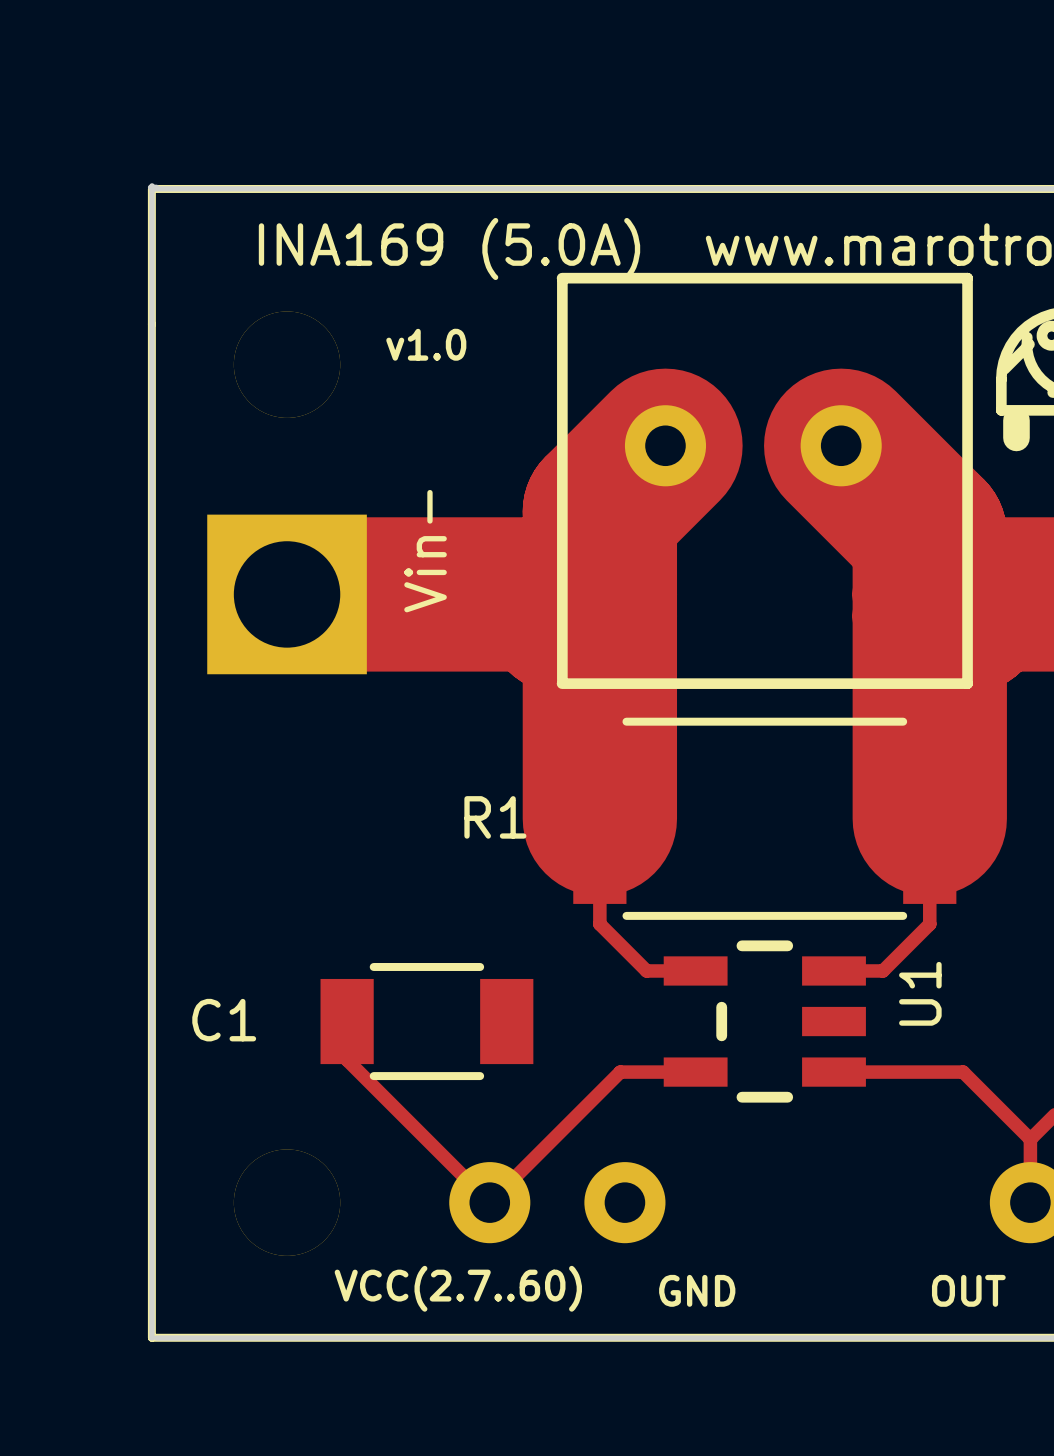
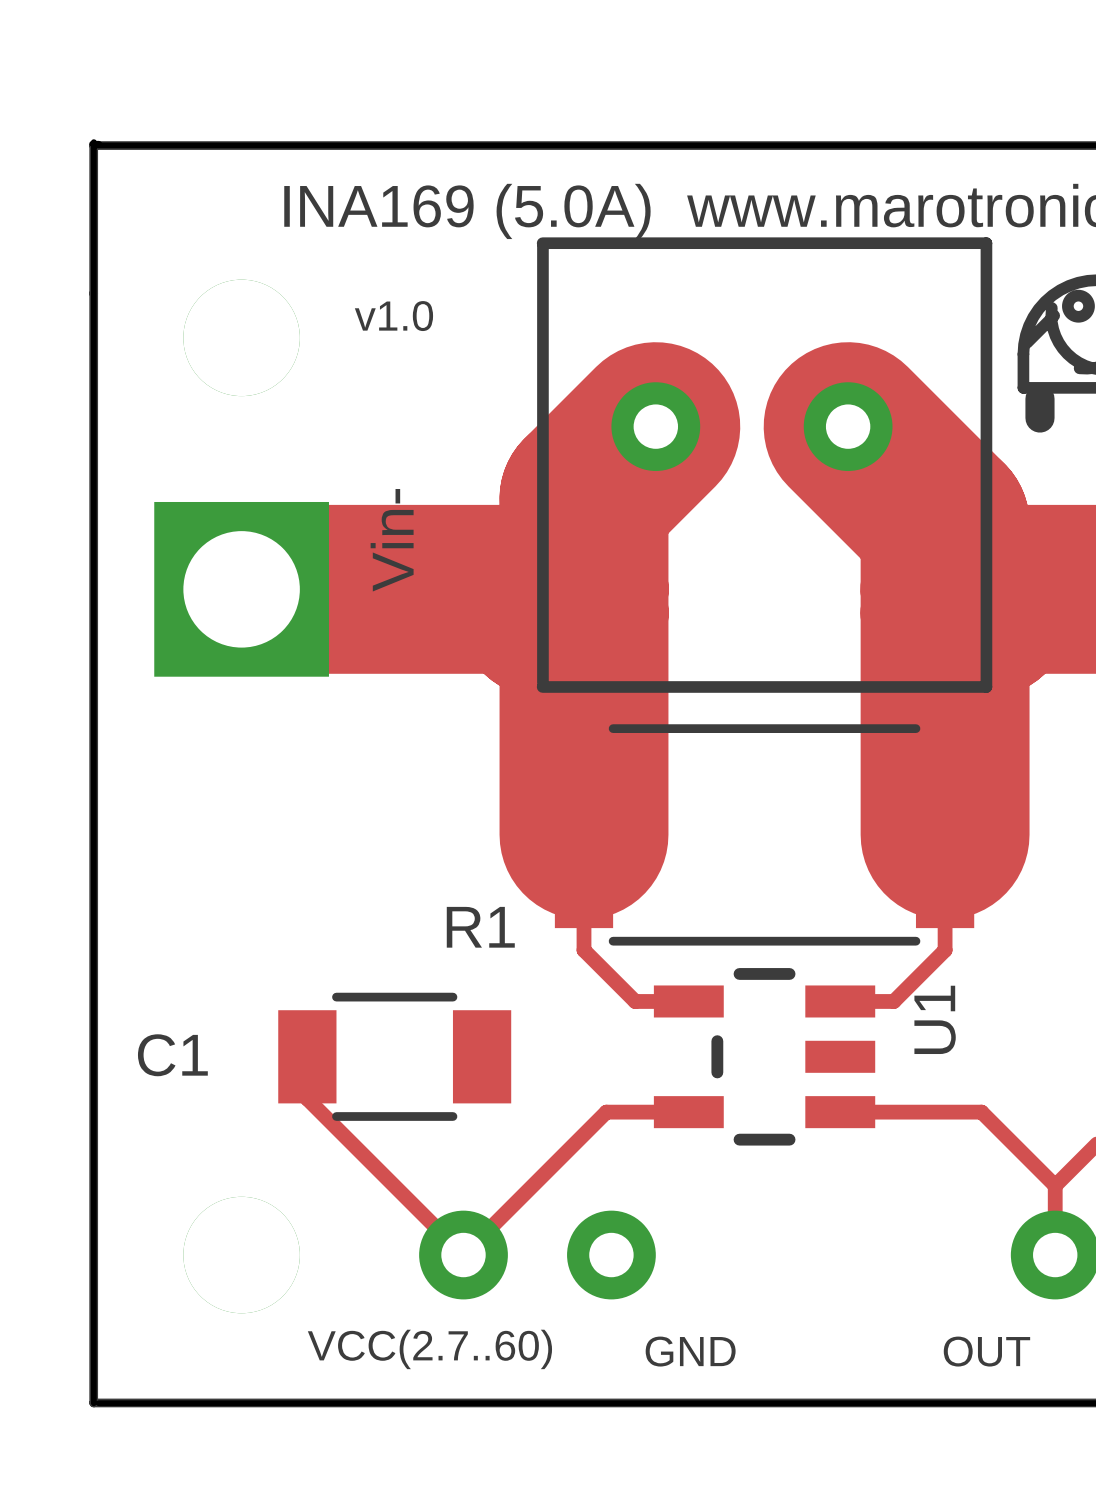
R1 name position: R1 (495, 817) -> R1 (480, 927)

